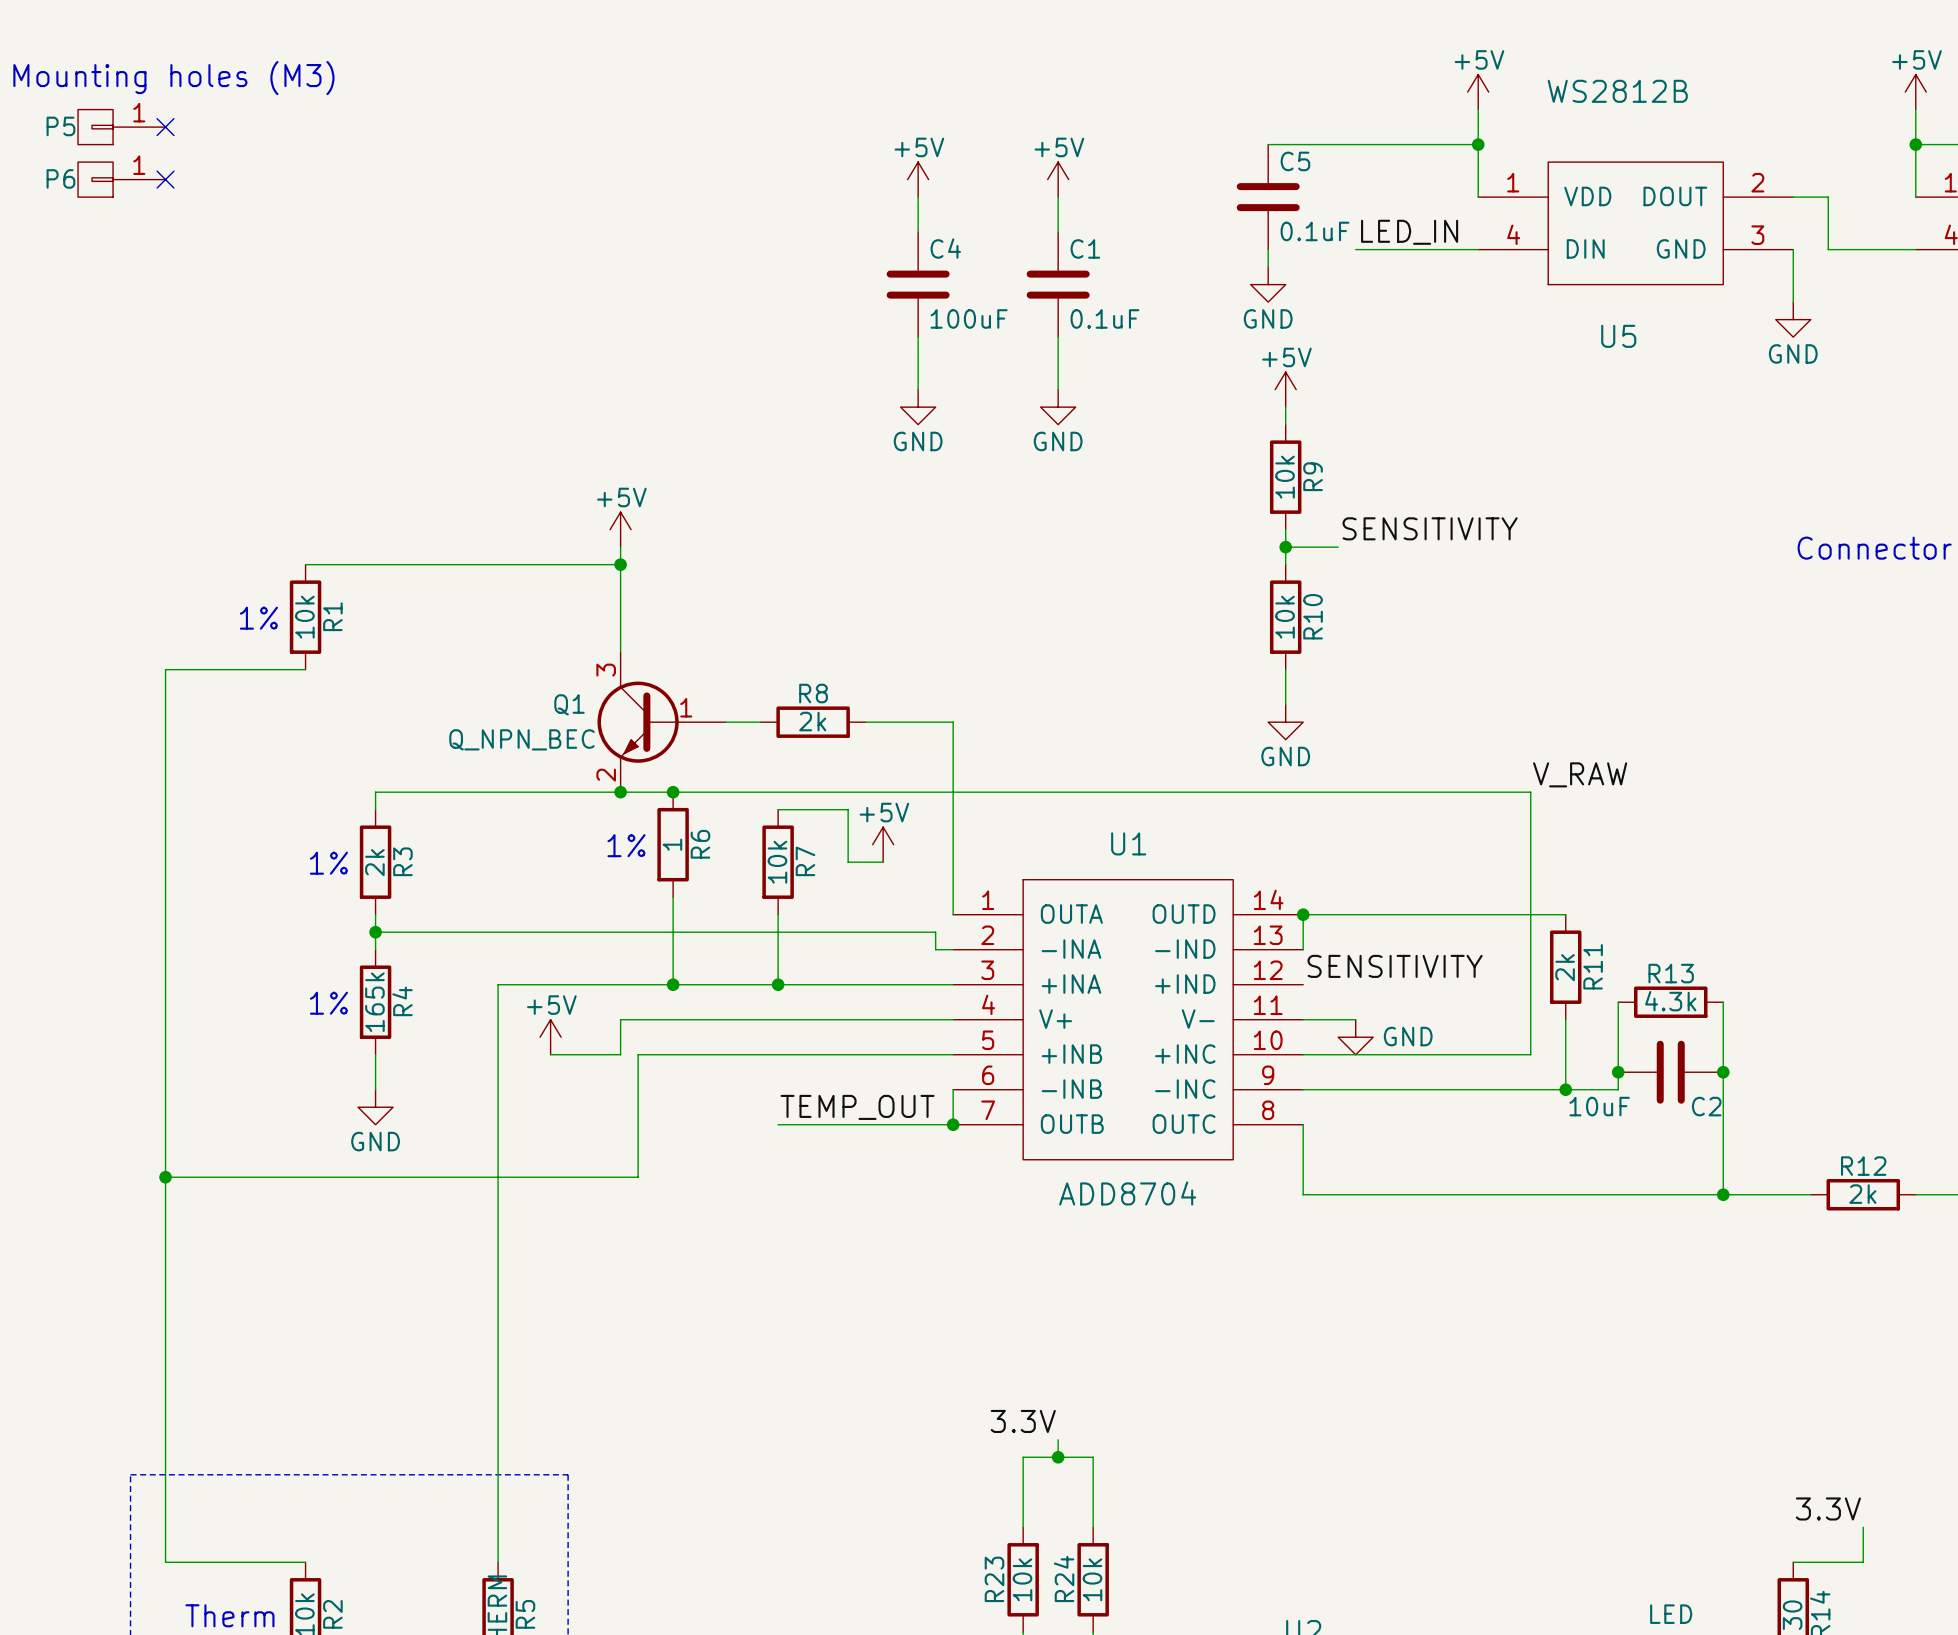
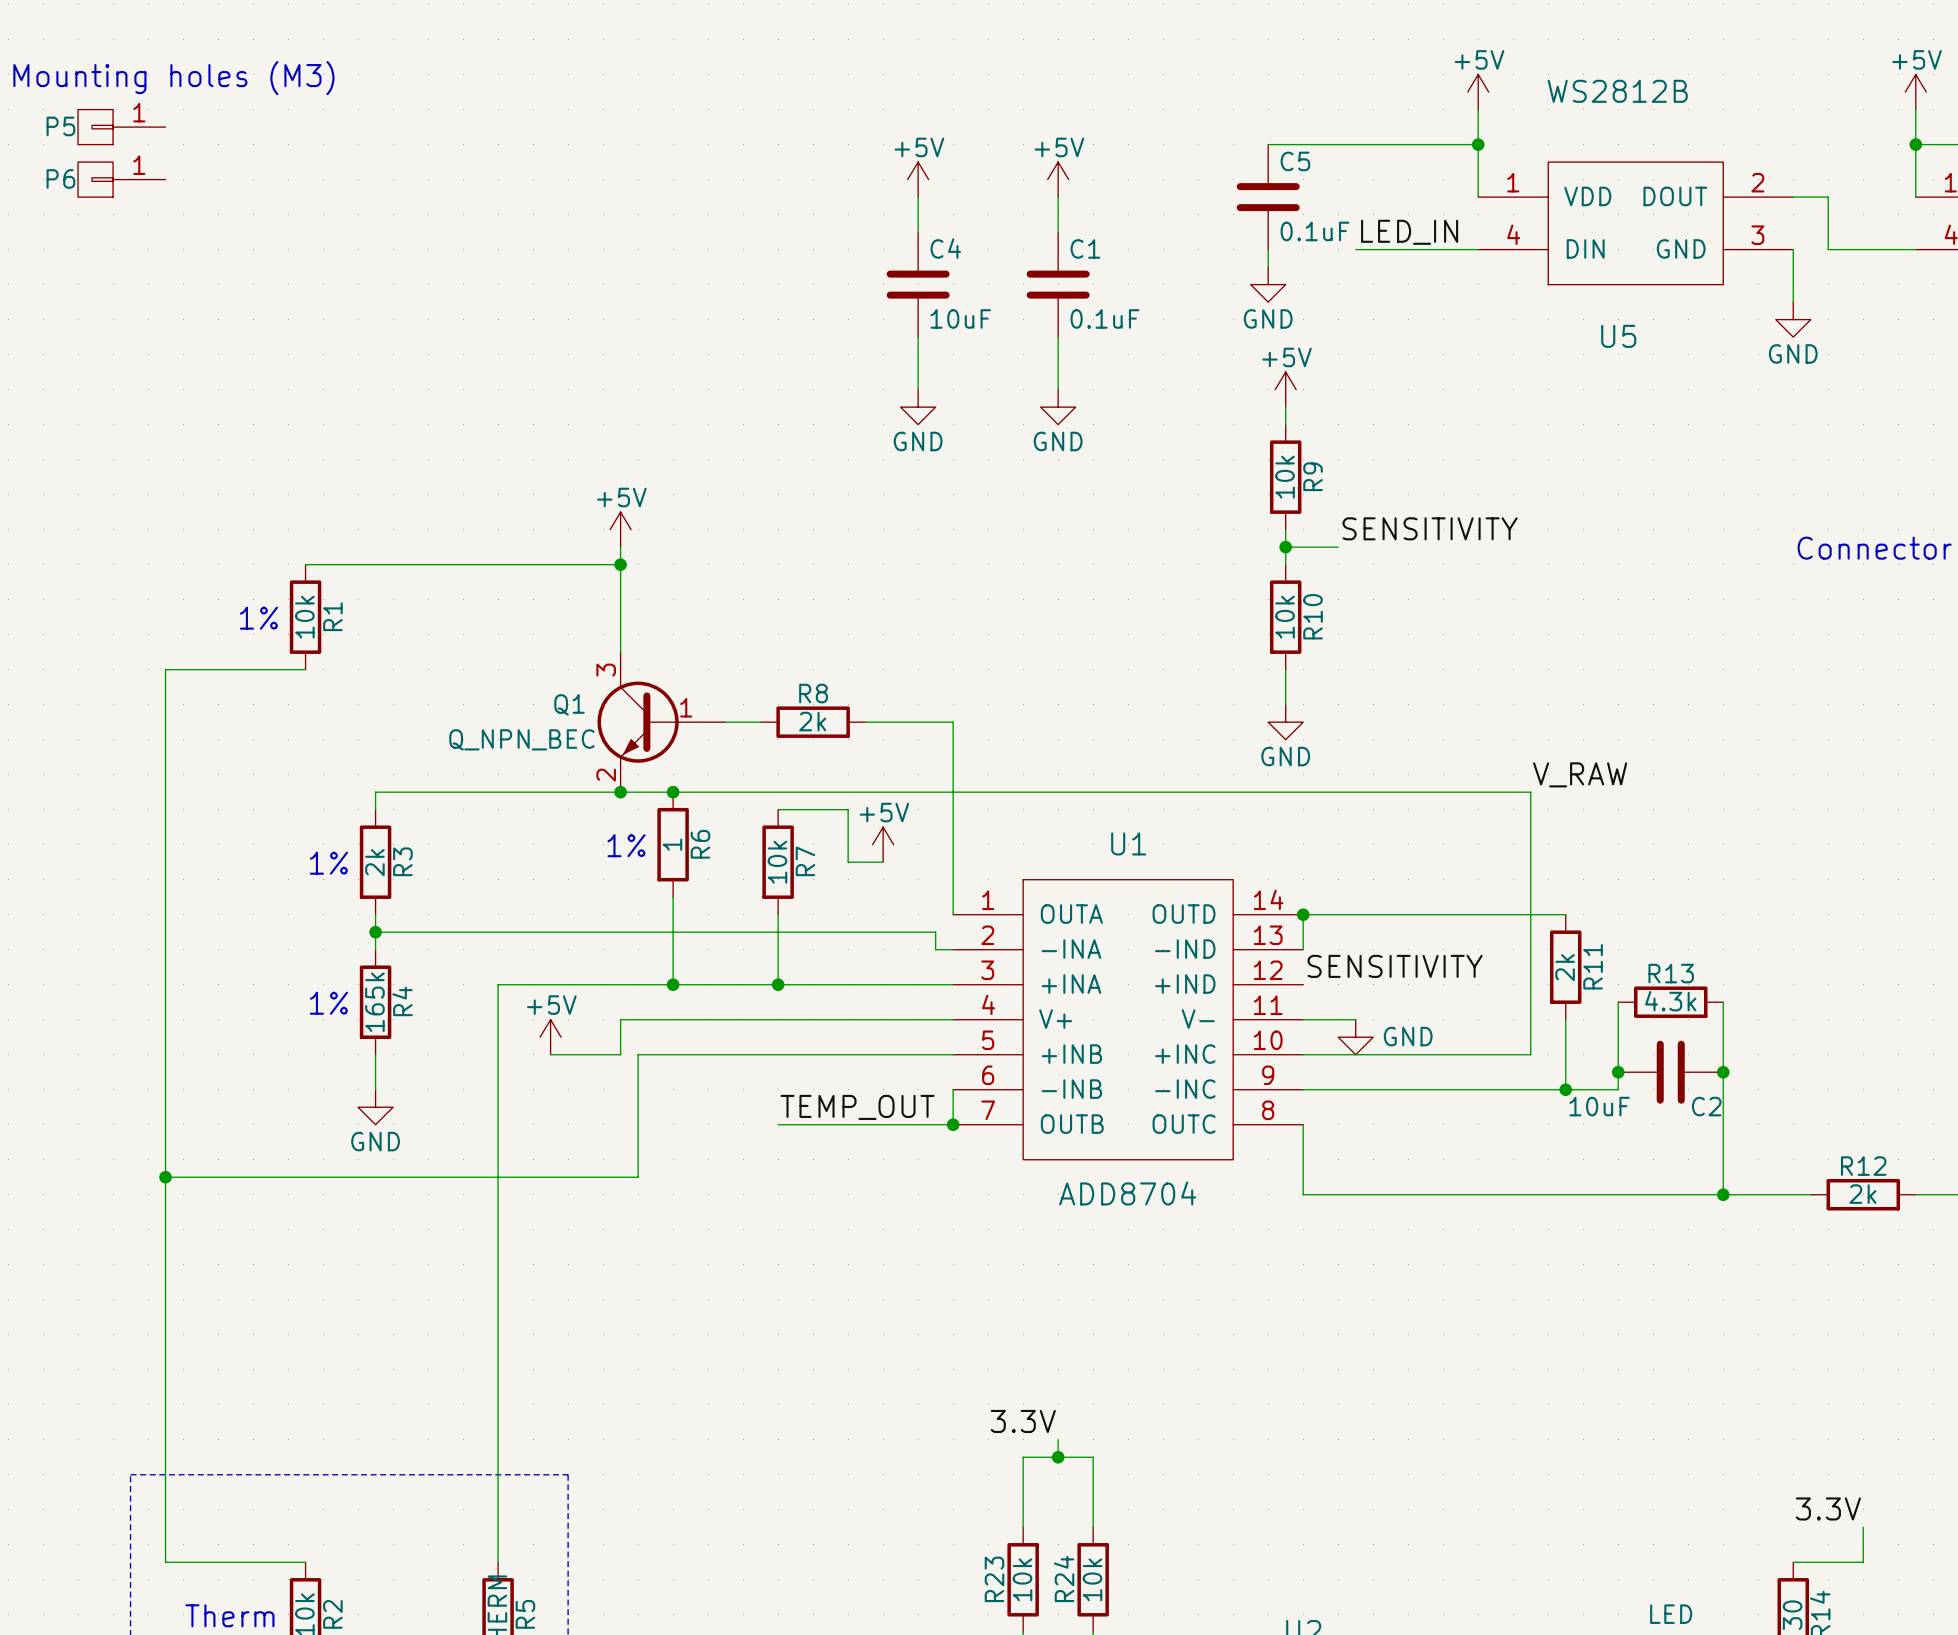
no-connect mark: (165, 127) -> none
no-connect mark: (165, 179) -> none
C4 value: 100uF (969, 318) -> 10uF (960, 318)

